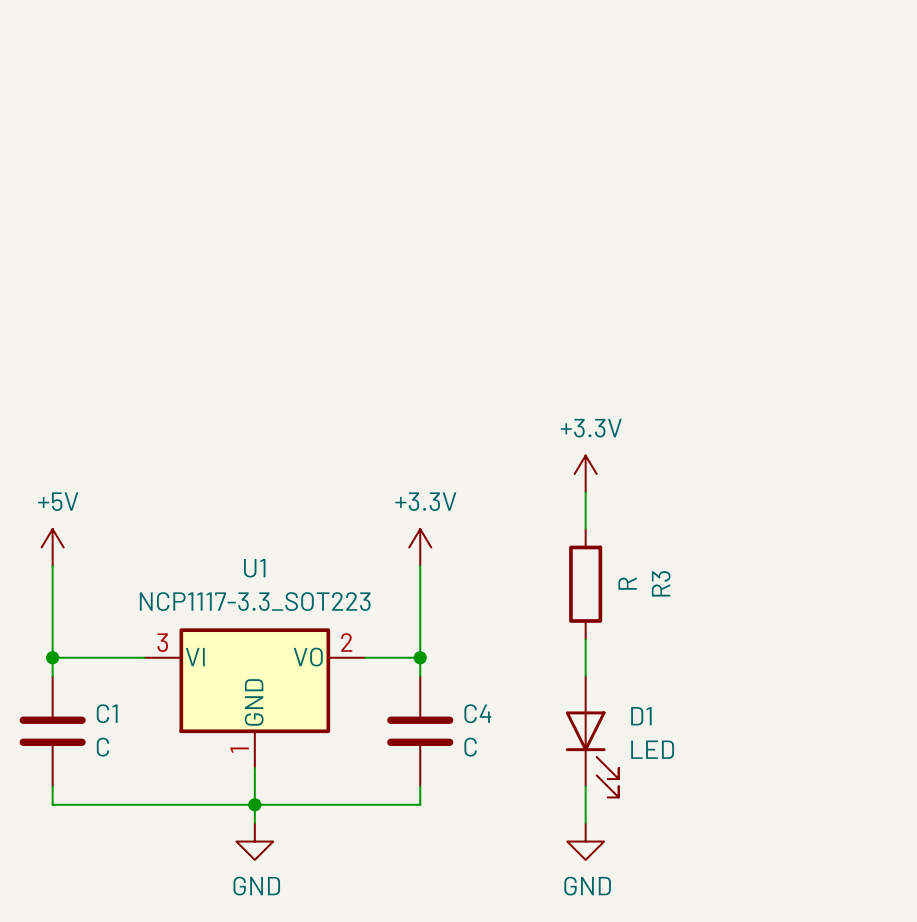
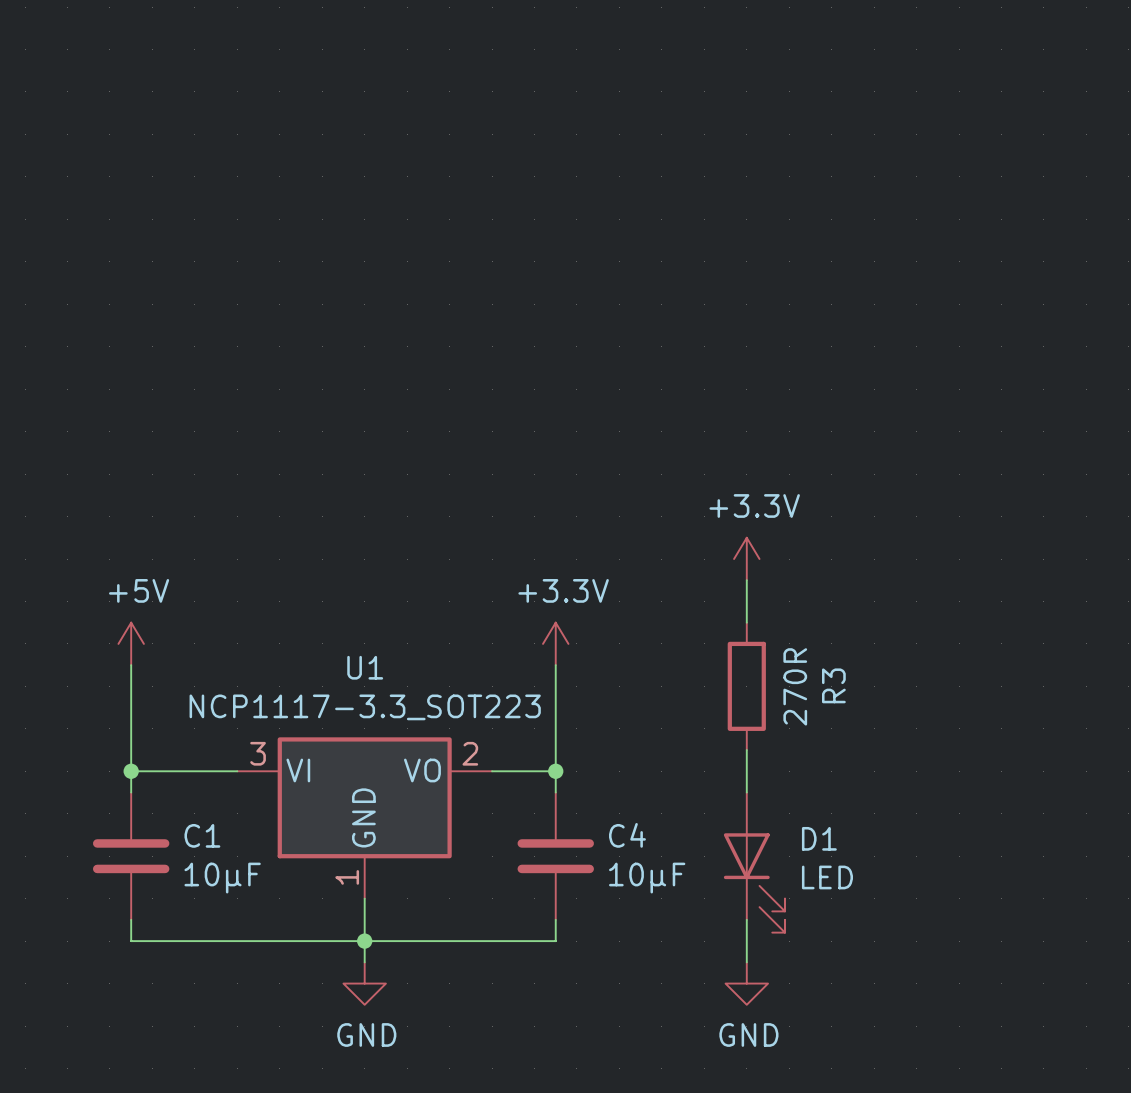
R3 value: R (627, 583) -> 270R (795, 686)
C1 value: C (102, 747) -> 10µF (222, 878)
C4 value: C (470, 747) -> 10µF (647, 878)

